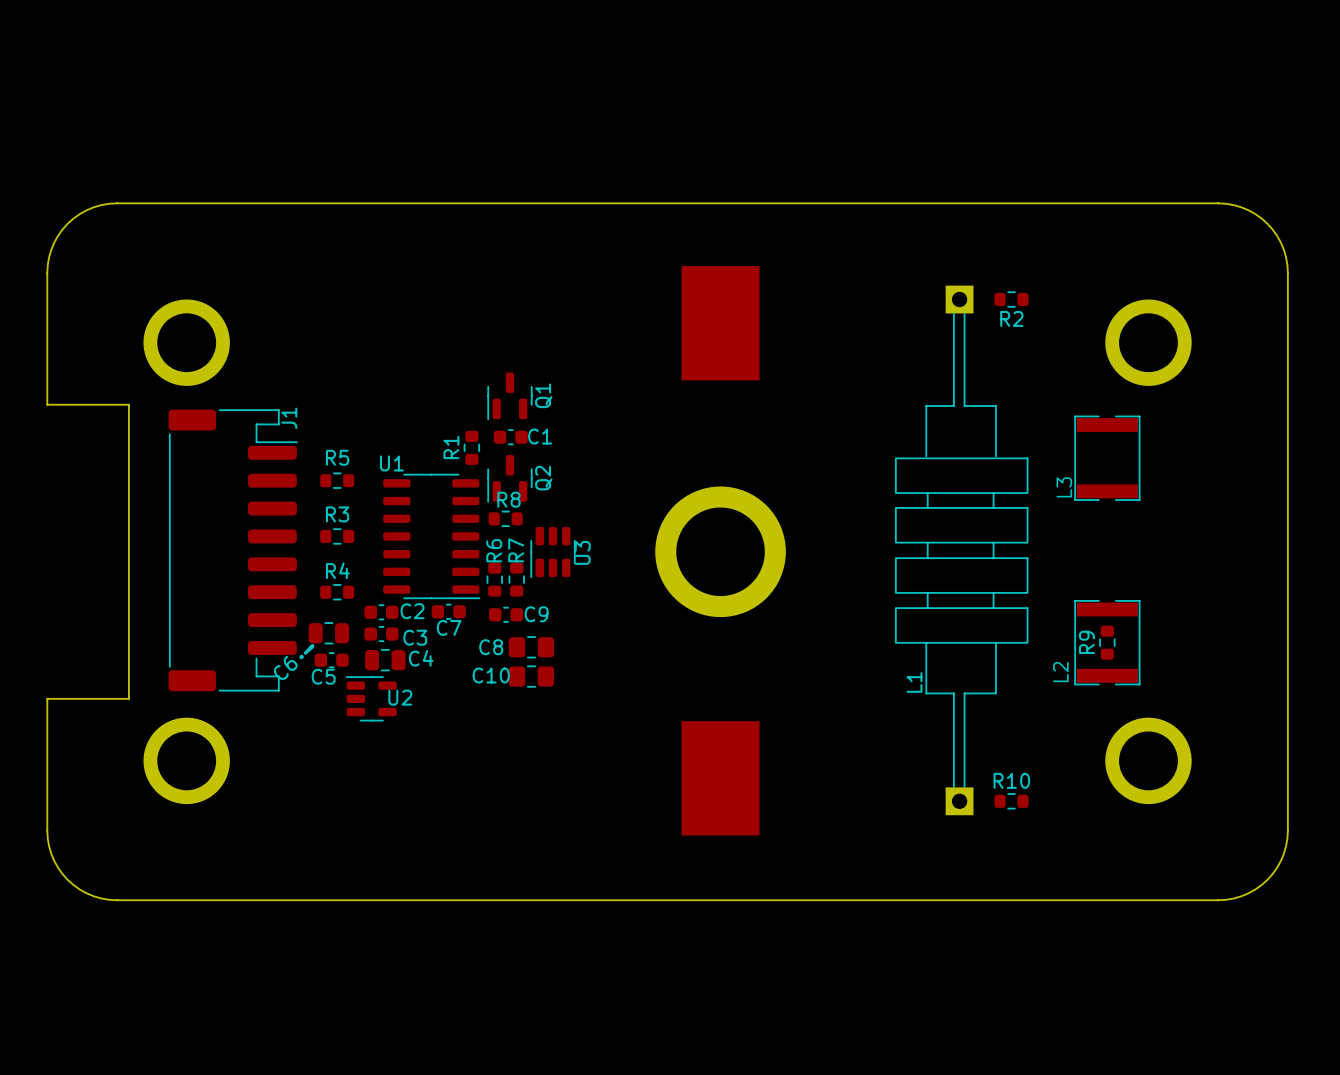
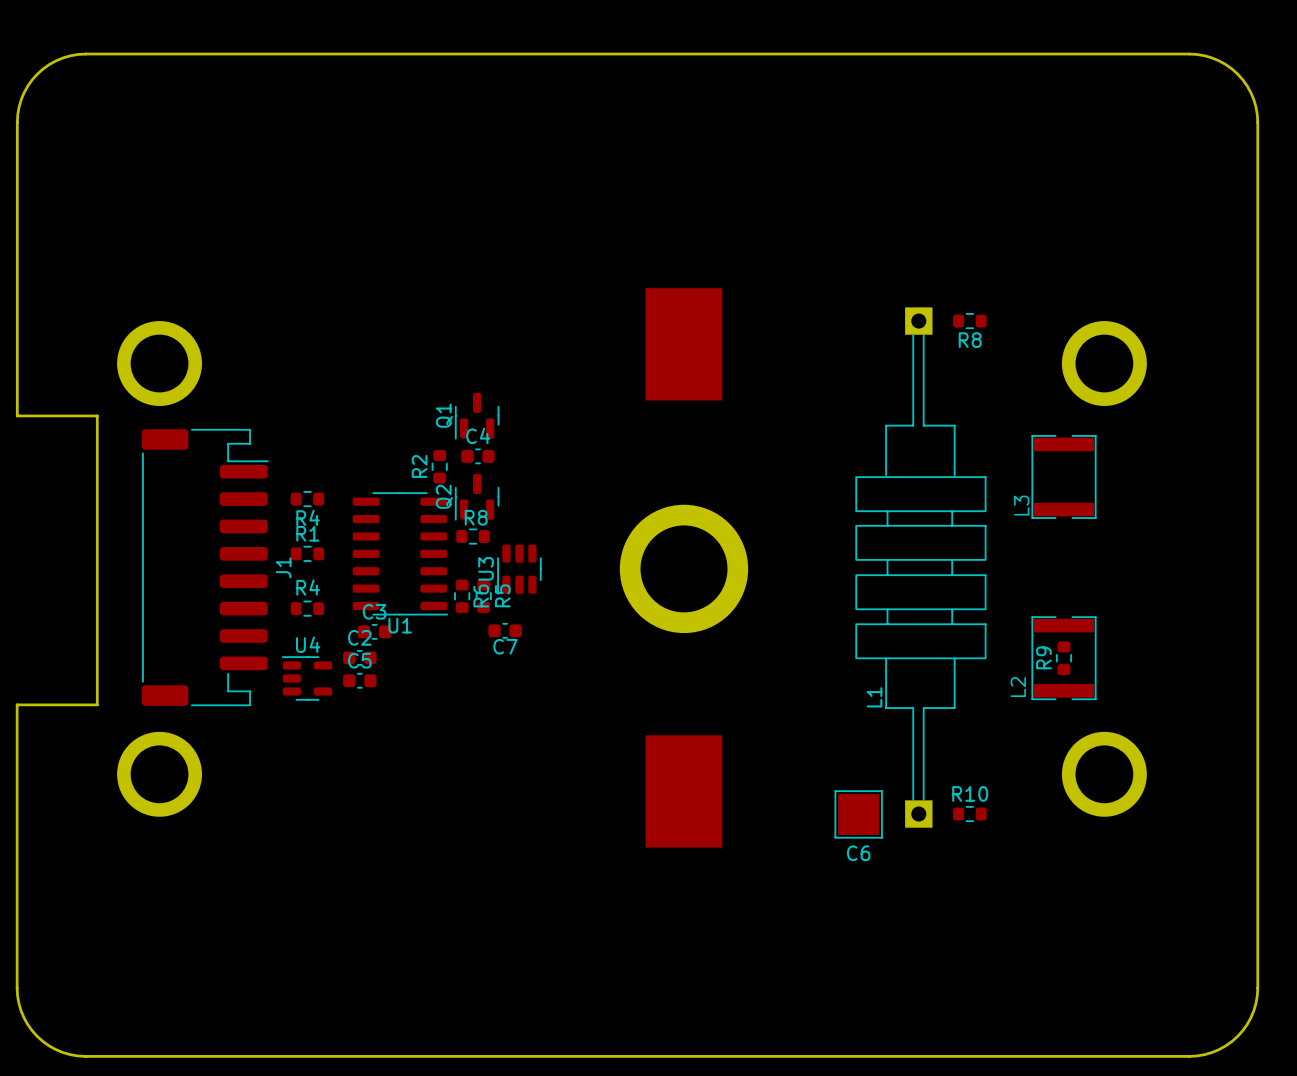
board edge: (117, 203) (1218, 203) (1241, 207) (1255, 214) (1272, 229) (1280, 242) (1286, 257) (1287, 273) (1287, 830) (1283, 853) (1277, 867) (1261, 885) (1248, 893) (1233, 898) (1218, 900) (117, 900) (101, 898) (79, 889) (62, 874) (54, 860) (49, 846) (47, 830) (47, 698) (128, 698) (128, 404) (47, 404) (47, 273) (51, 250) (57, 235) (67, 223) (86, 210) (101, 205) (117, 203) -> (85, 54) (63, 57) (49, 64) (37, 74) (27, 86) (21, 99) (17, 122) (17, 415) (97, 415) (97, 704) (17, 704) (17, 995) (20, 1010) (27, 1024) (42, 1041) (62, 1052) (85, 1056) (1189, 1056) (1204, 1054) (1218, 1049) (1231, 1041) (1242, 1030) (1253, 1010) (1257, 987) (1257, 122) (1256, 107) (1250, 92) (1242, 79) (1231, 68) (1211, 57) (1189, 54) (85, 54)
R2 name: R2 (1011, 318) -> R8 (970, 340)
Q1 name position: Q1 (543, 395) -> Q1 (444, 415)
J1 name position: J1 (289, 418) -> J1 (283, 567)
C1 name: C1 (540, 436) -> C4 (478, 435)
R1 name: R1 (451, 447) -> R2 (419, 466)
R5 name: R5 (337, 457) -> R4 (308, 517)
U1 name position: U1 (391, 463) -> U1 (400, 625)
Q2 name position: Q2 (543, 478) -> Q2 (444, 496)
R3 name: R3 (337, 514) -> R1 (307, 533)
R6 name position: R6 (494, 550) -> R6 (481, 595)
R7 name: R7 (516, 550) -> R5 (502, 595)
U3 name position: U3 (582, 552) -> U3 (486, 568)
C2 name position: C2 (412, 611) -> C2 (359, 637)
C7 position: (448, 611) -> (505, 630)
C2 position: (381, 612) -> (359, 657)
C9: (506, 614) -> none
C6 footprint: [308, 622, 350, 645] -> [834, 790, 883, 839]
C3 position: (381, 634) -> (374, 631)
C3 name position: C3 (415, 637) -> C3 (374, 611)
C8: (531, 647) -> none
text: ! (306, 651) -> none
C5 position: (331, 660) -> (359, 680)
C4: (385, 660) -> none
U4: none -> (307, 678)
C6 name position: C6 (285, 667) -> C6 (858, 853)
C5 name position: C5 (323, 676) -> C5 (359, 660)
C10: (531, 676) -> none
U2: (371, 698) -> none

